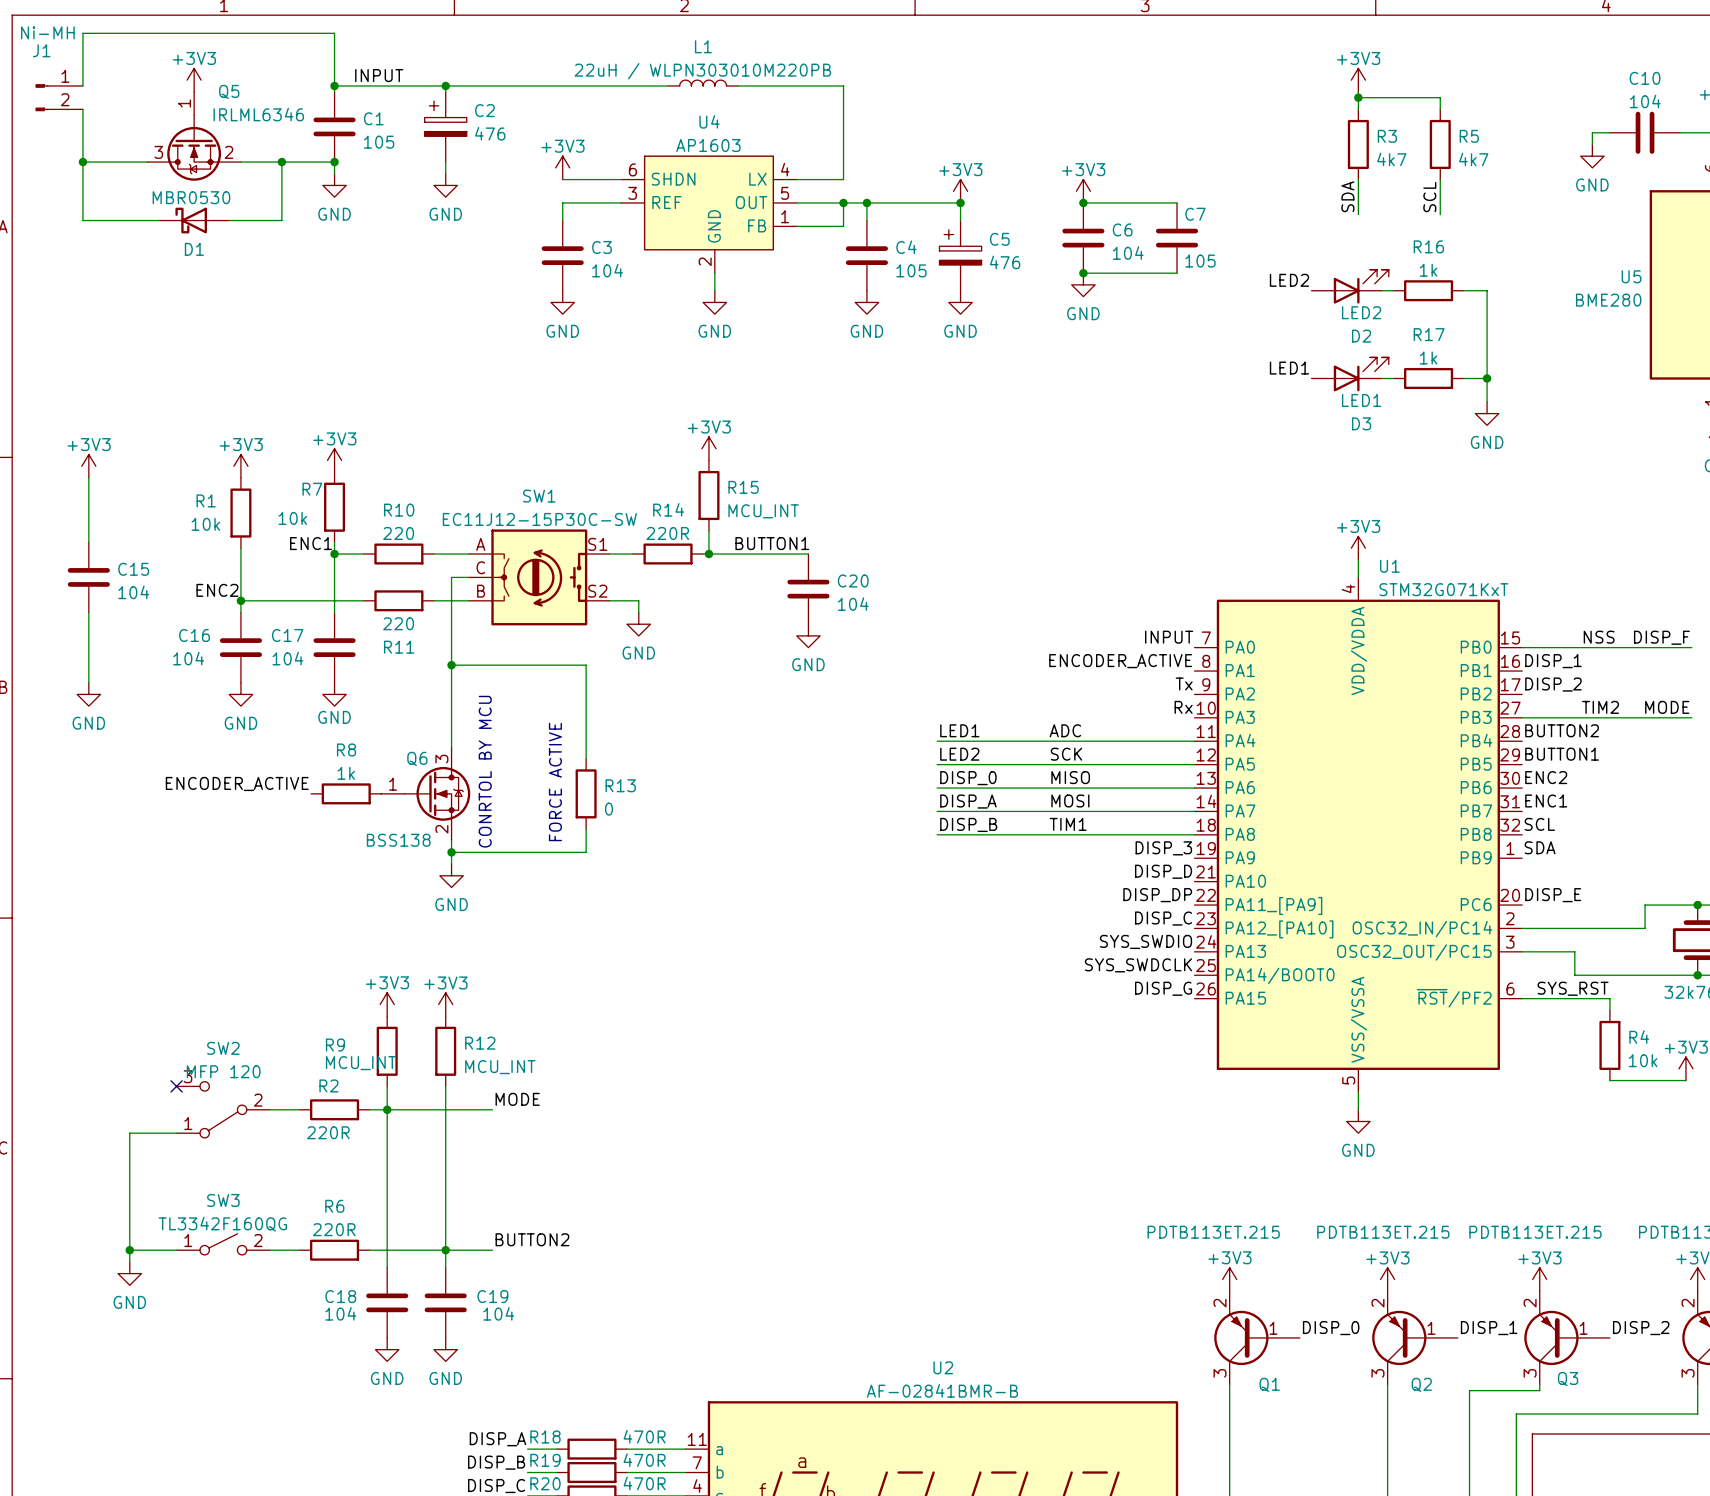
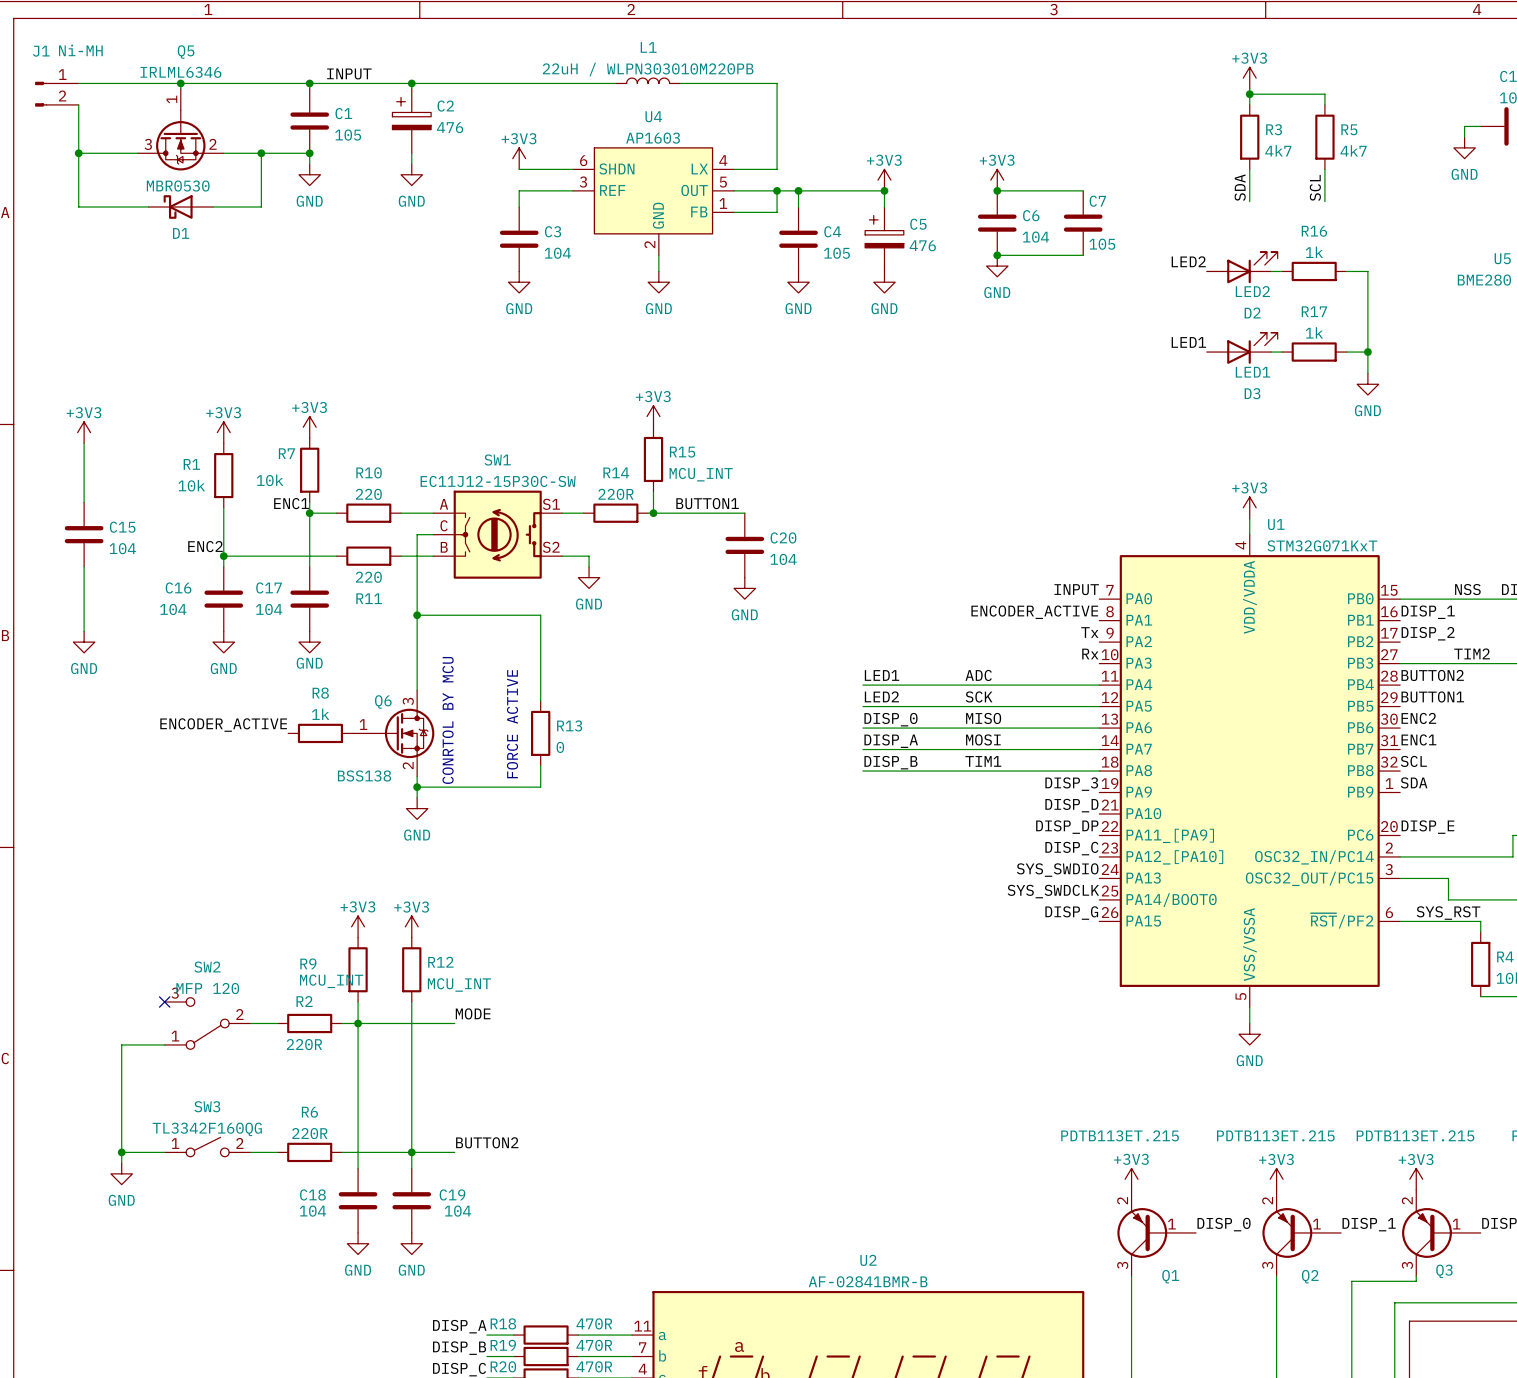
J1 value position: Ni-MH (47, 32) -> Ni-MH (80, 50)
power symbol: +3V3 (194, 80) -> none
wire: (82, 85) (82, 33) (334, 33) (334, 85) -> (78, 83) (309, 83)
junction: none -> (180, 83)
Q5 name position: Q5 (229, 91) -> Q5 (186, 51)
Q5 value position: IRLML6346 (258, 114) -> IRLML6346 (180, 72)

